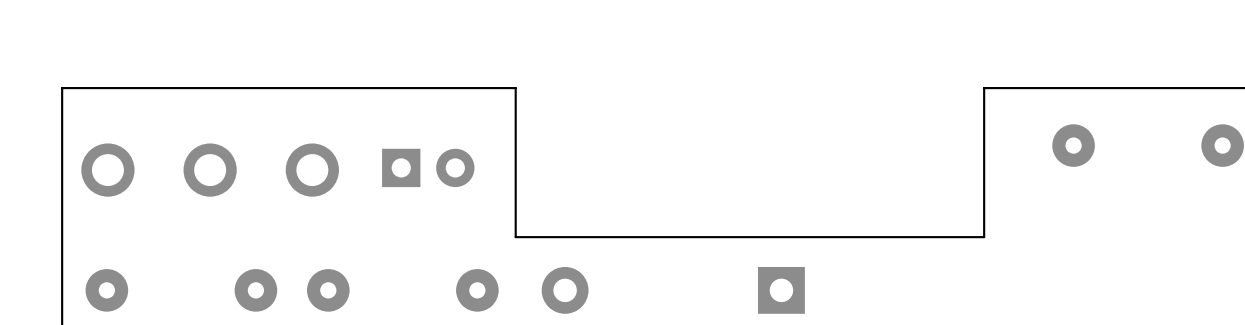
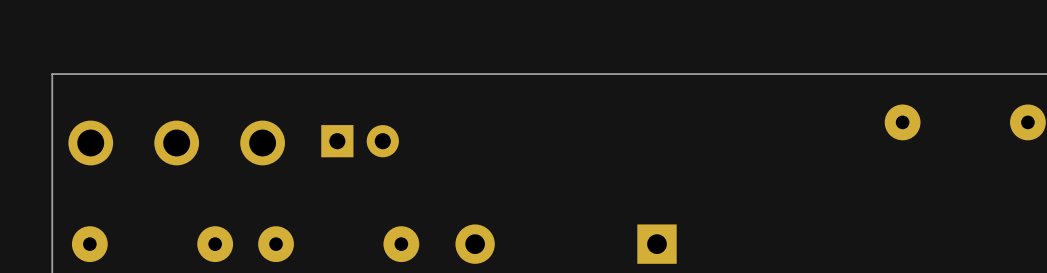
board edge: (984, 88) (984, 237) (515, 237) (515, 88) -> (827, 74) (433, 74)

